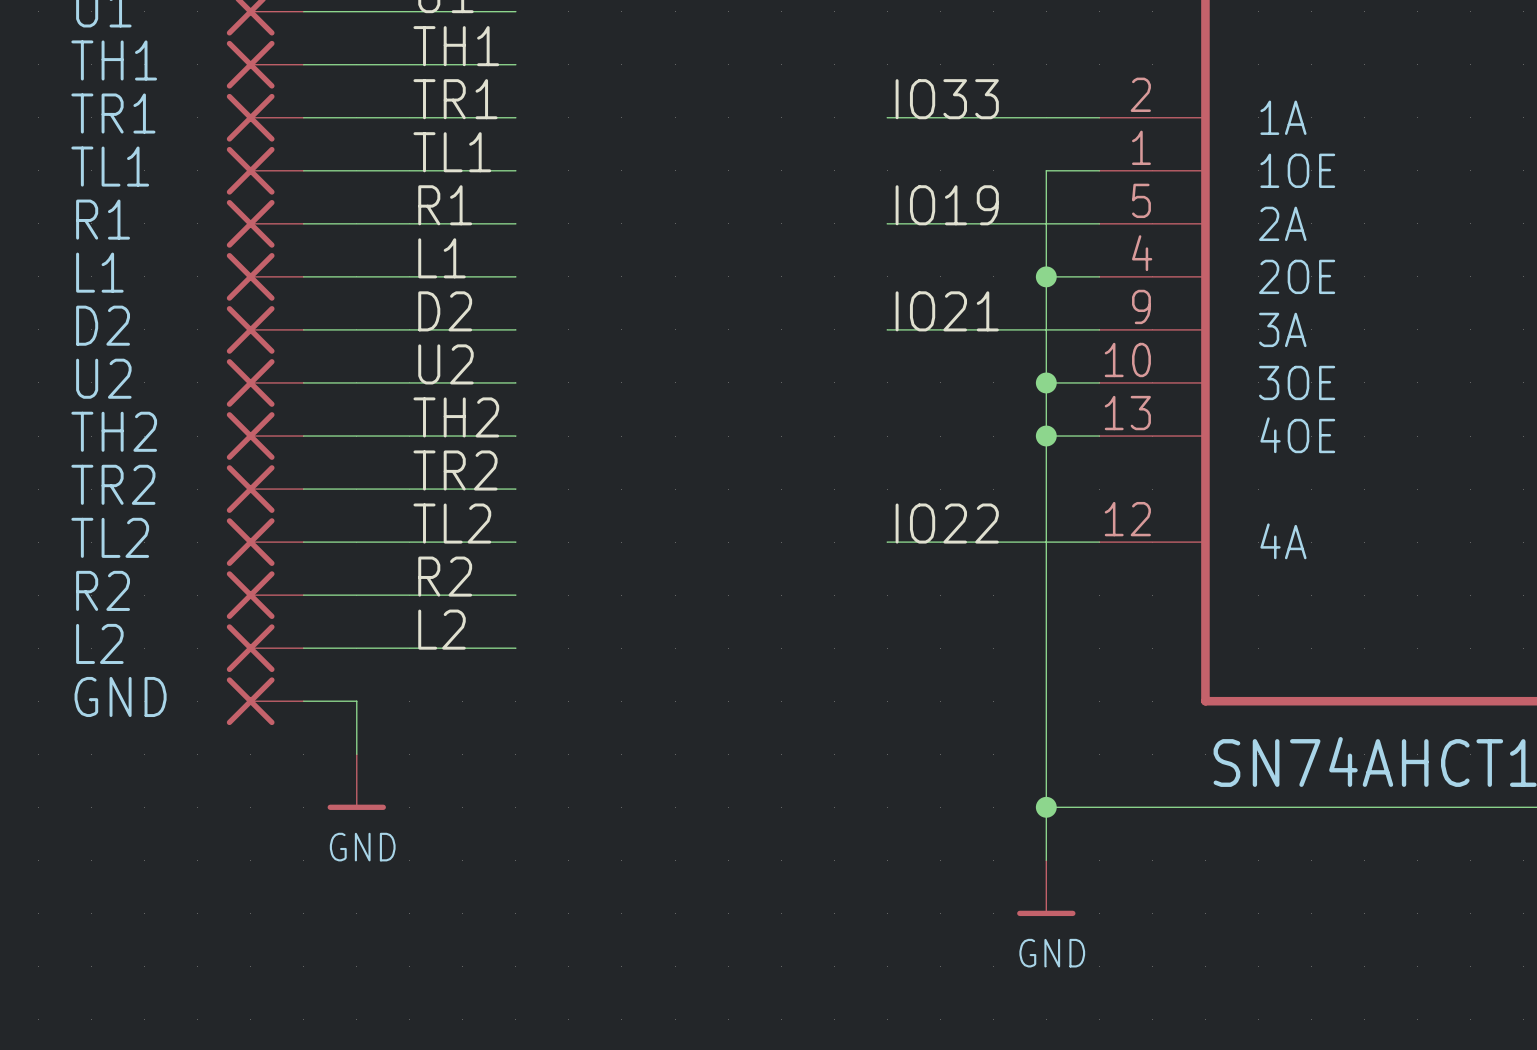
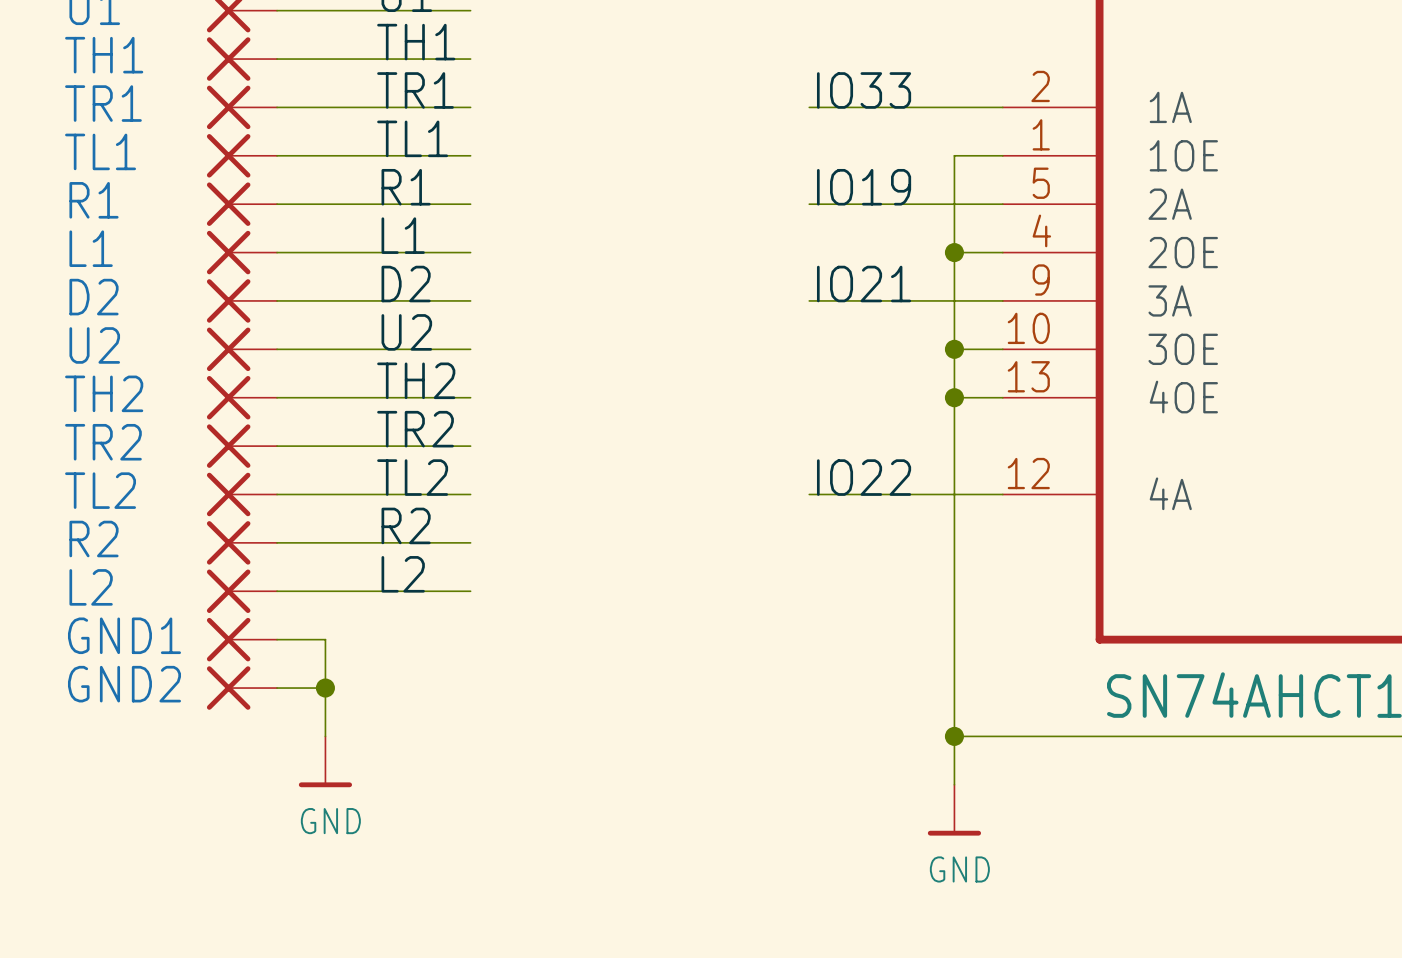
GND name: GND (120, 696) -> GND1 (124, 635)
GND2: none -> (241, 688)
wire: none -> (277, 688) (325, 688) (325, 736)
junction: none -> (325, 688)
power symbol position: GND (356, 782) -> GND (325, 761)

